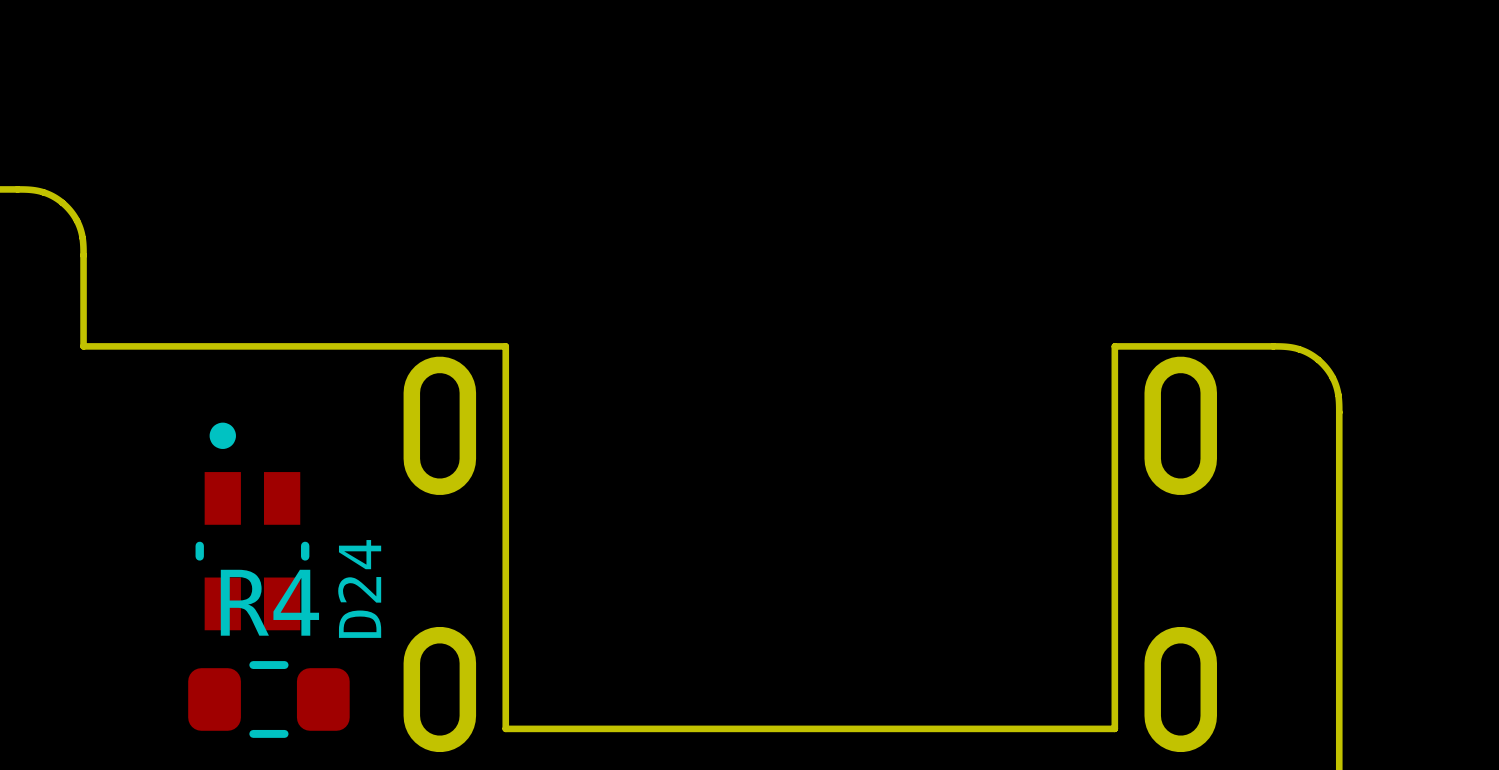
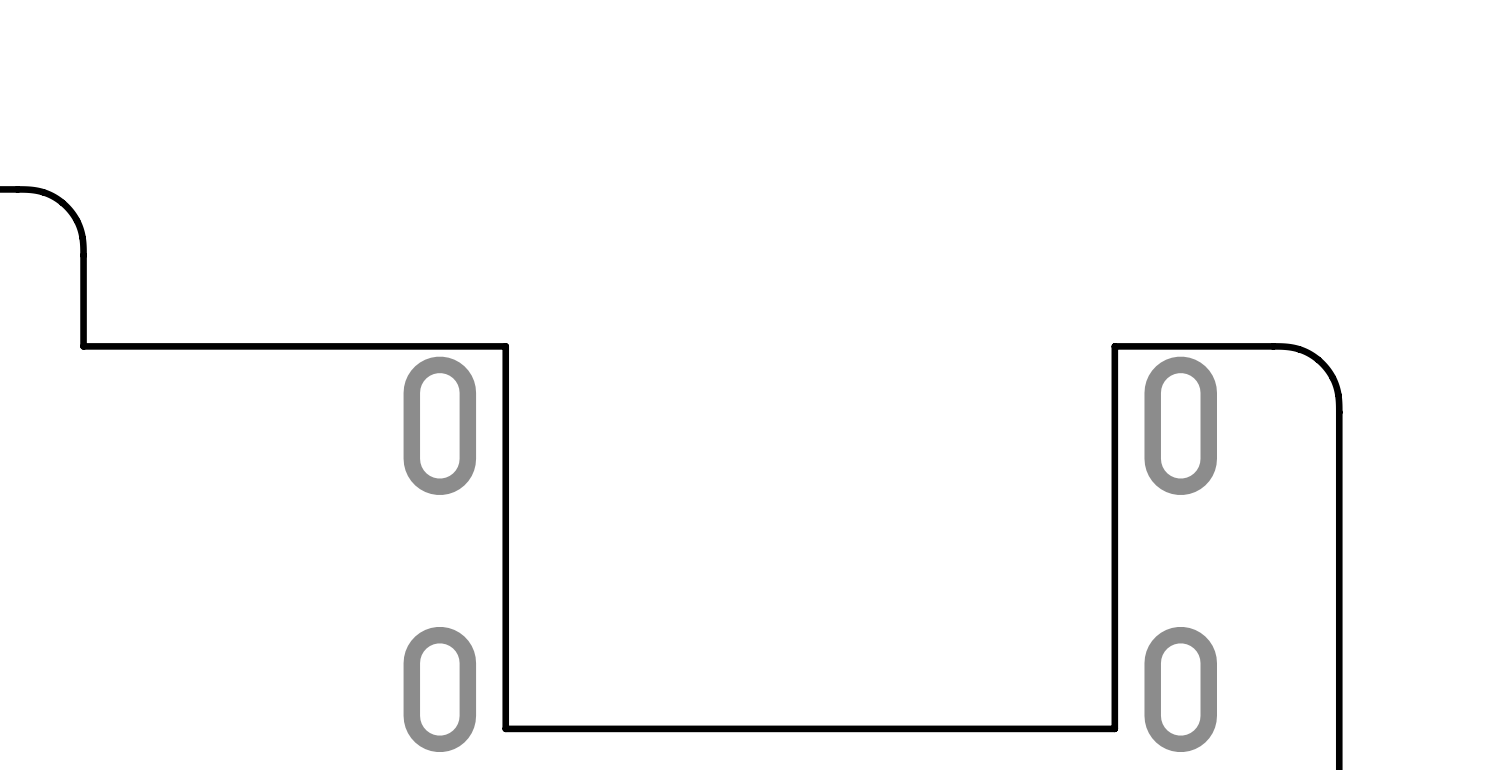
D24: (252, 526) -> none
R4: (268, 699) -> none

